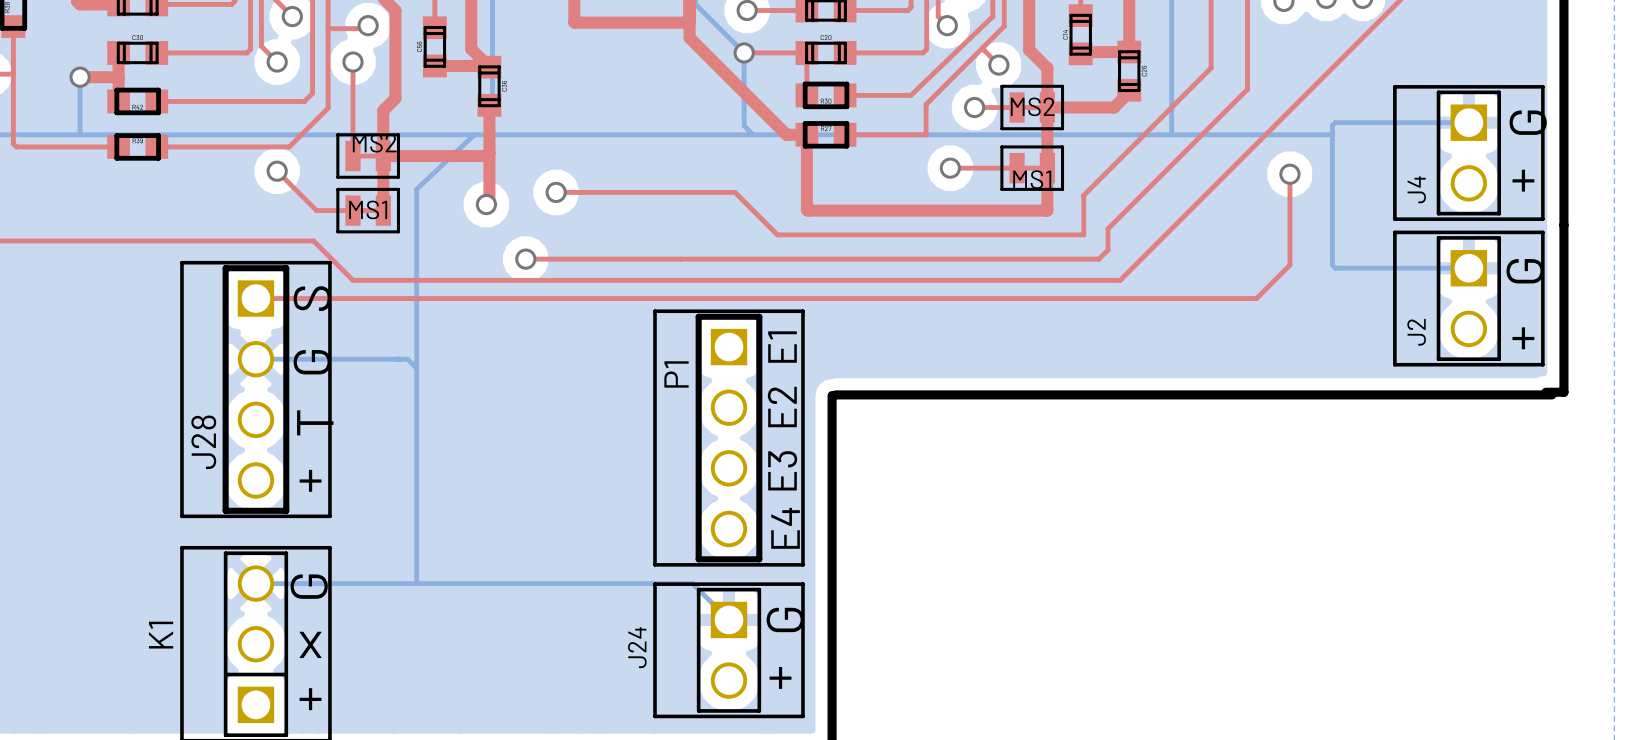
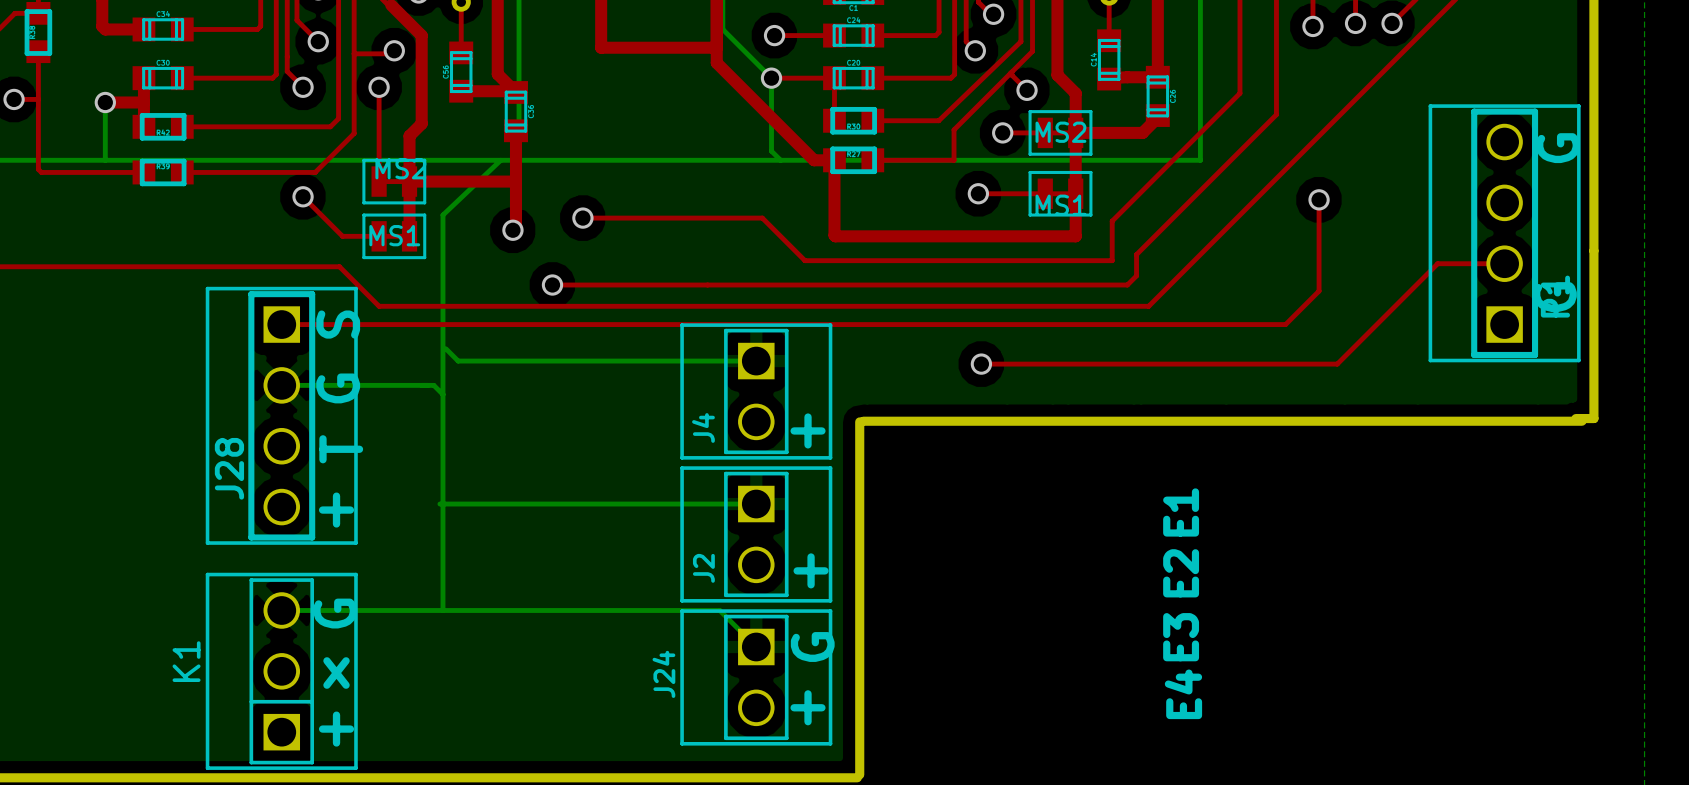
bottom track: (1468, 122) (1335, 122) (1332, 125) (1332, 265) (1335, 268) (1468, 268) -> none
bottom track: (1171, 134) (1332, 134) -> none
J4 position: (1468, 153) -> (756, 391)
text: + (1523, 180) -> none
top track: none -> (1504, 263) (1437, 263) (1337, 364) (981, 364)
J2 position: (1468, 298) -> (756, 534)
bottom track: none -> (446, 348) (458, 361) (756, 361)
via: none -> (981, 364)
text: + (1523, 338) -> none
text position: E1 (782, 347) -> E1 (1181, 512)
text: none -> + (808, 430)
text position: E2 (782, 406) -> E2 (1181, 573)
P1 rotation: 0° (728, 438) -> 180° (1504, 233)
P1 position: (728, 438) -> (1504, 233)
text position: E3 (782, 470) -> E3 (1181, 637)
bottom track: none -> (439, 504) (756, 504)
text position: E4 (785, 528) -> E4 (1183, 694)
text: none -> + (811, 570)

